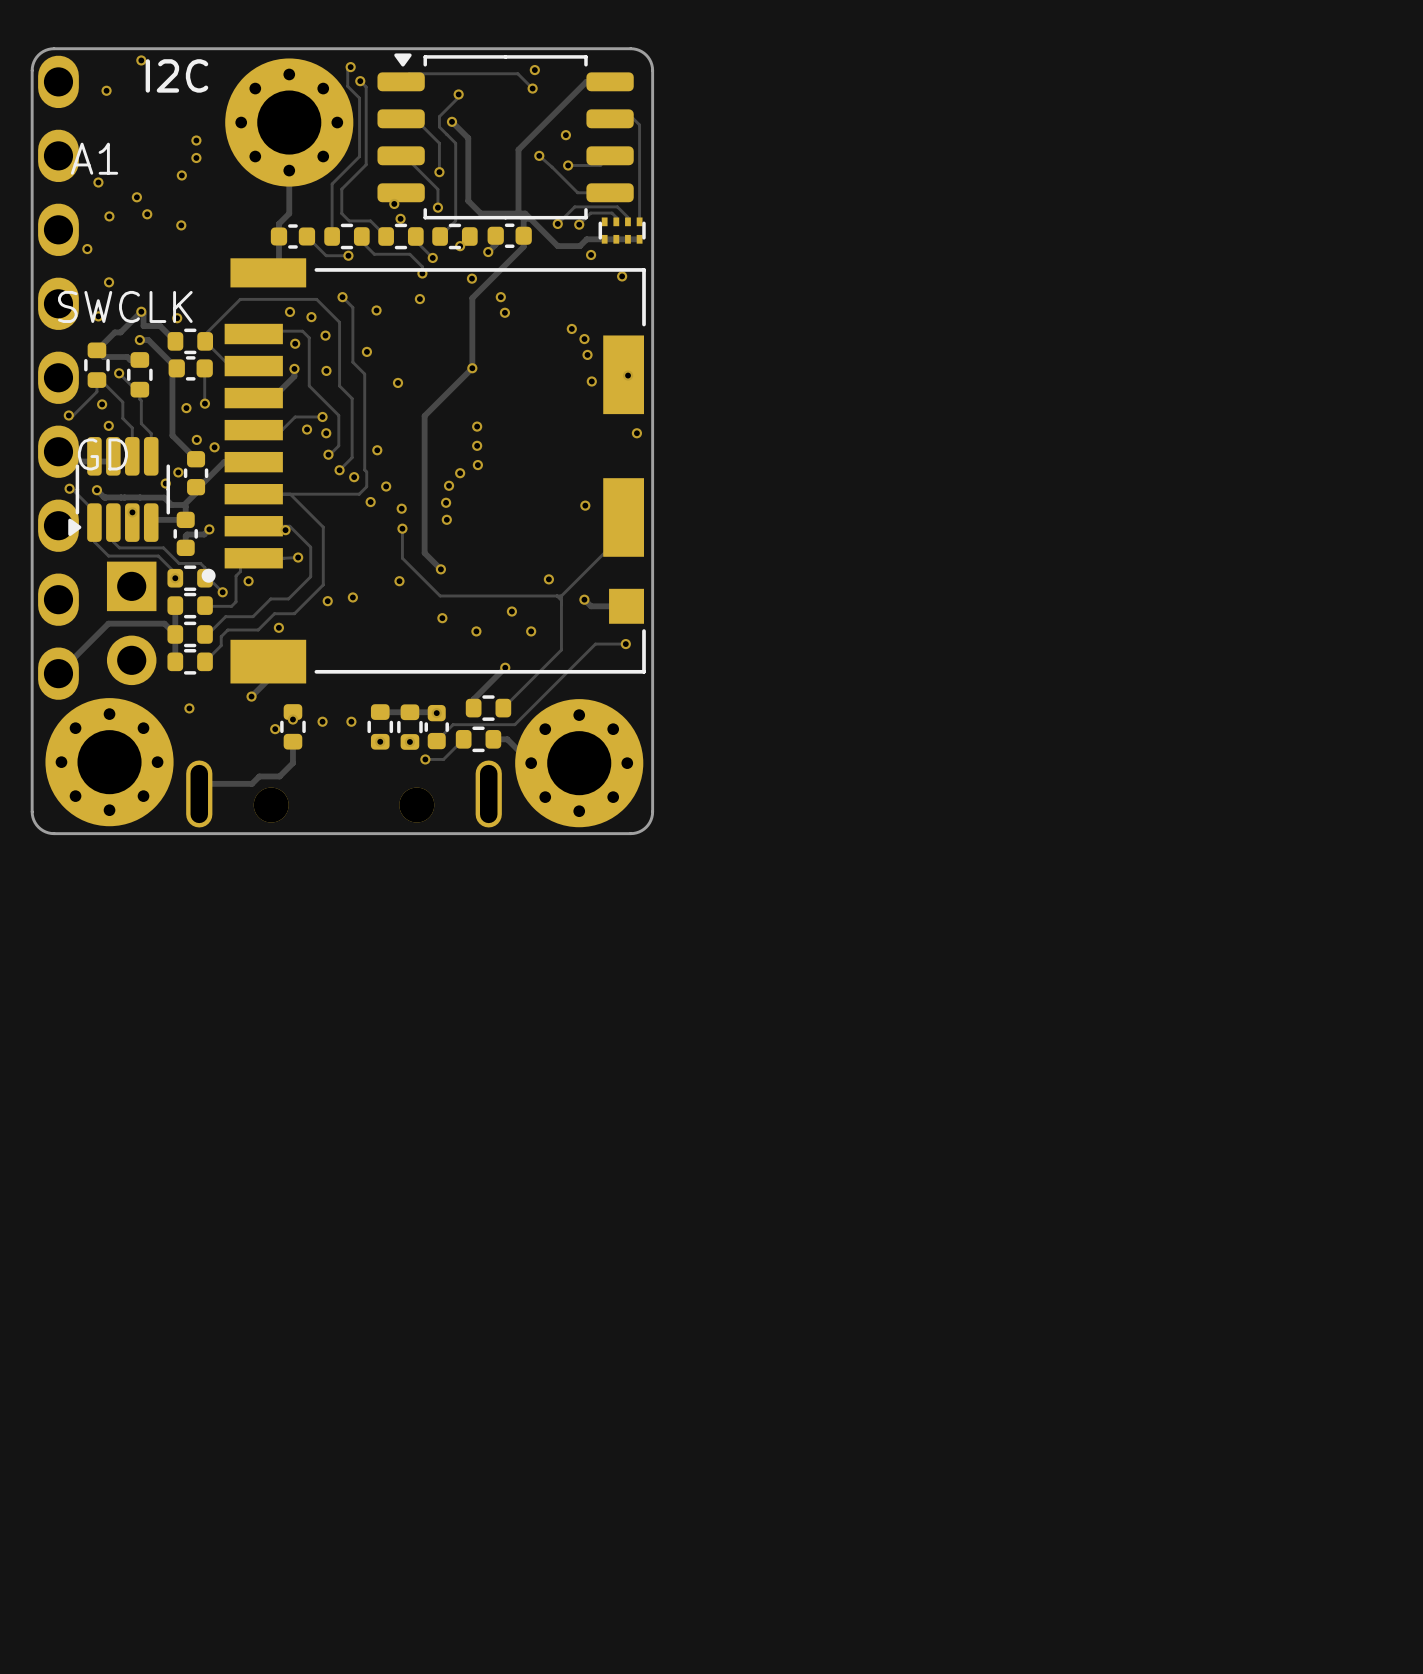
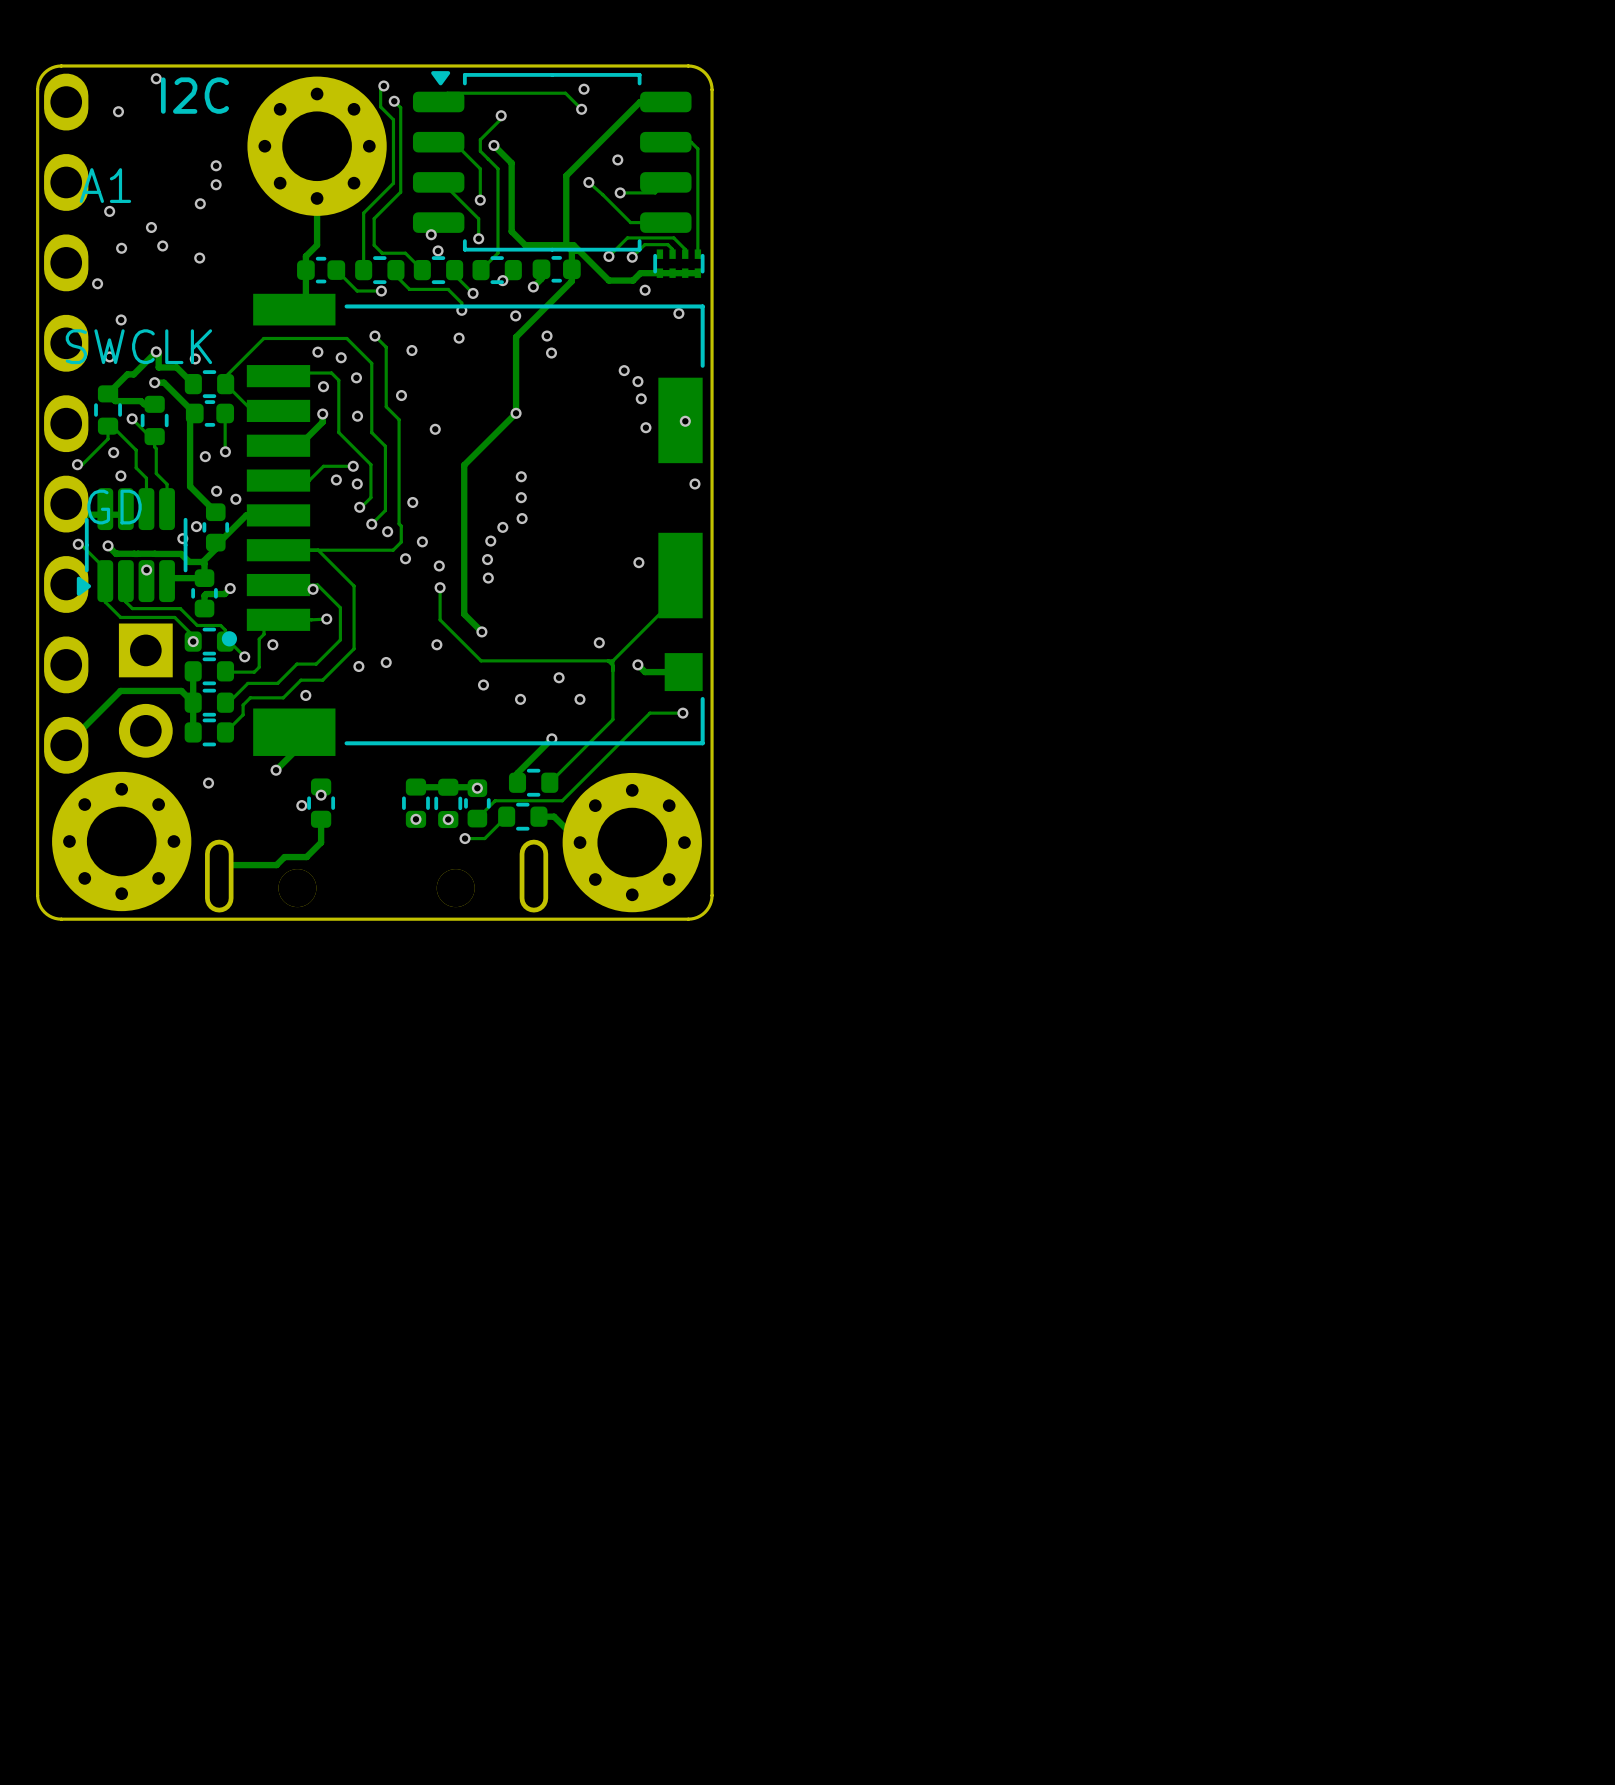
via: (322, 721) -> none
via: (351, 721) -> none

